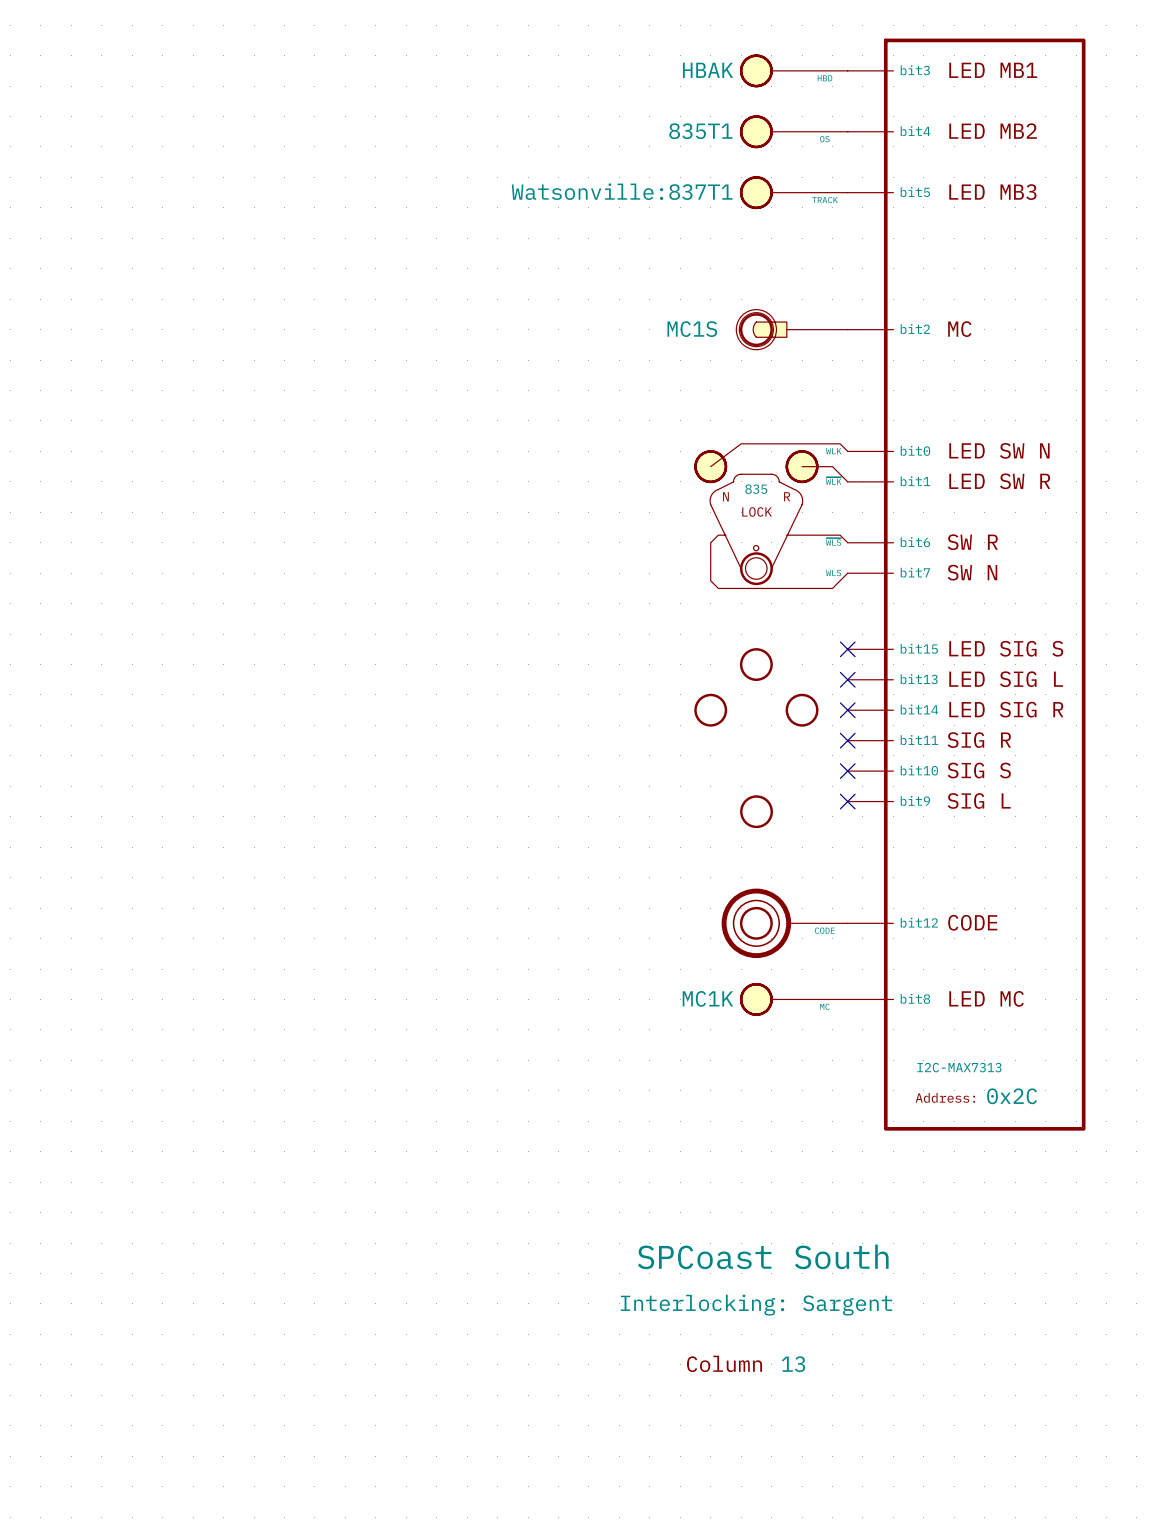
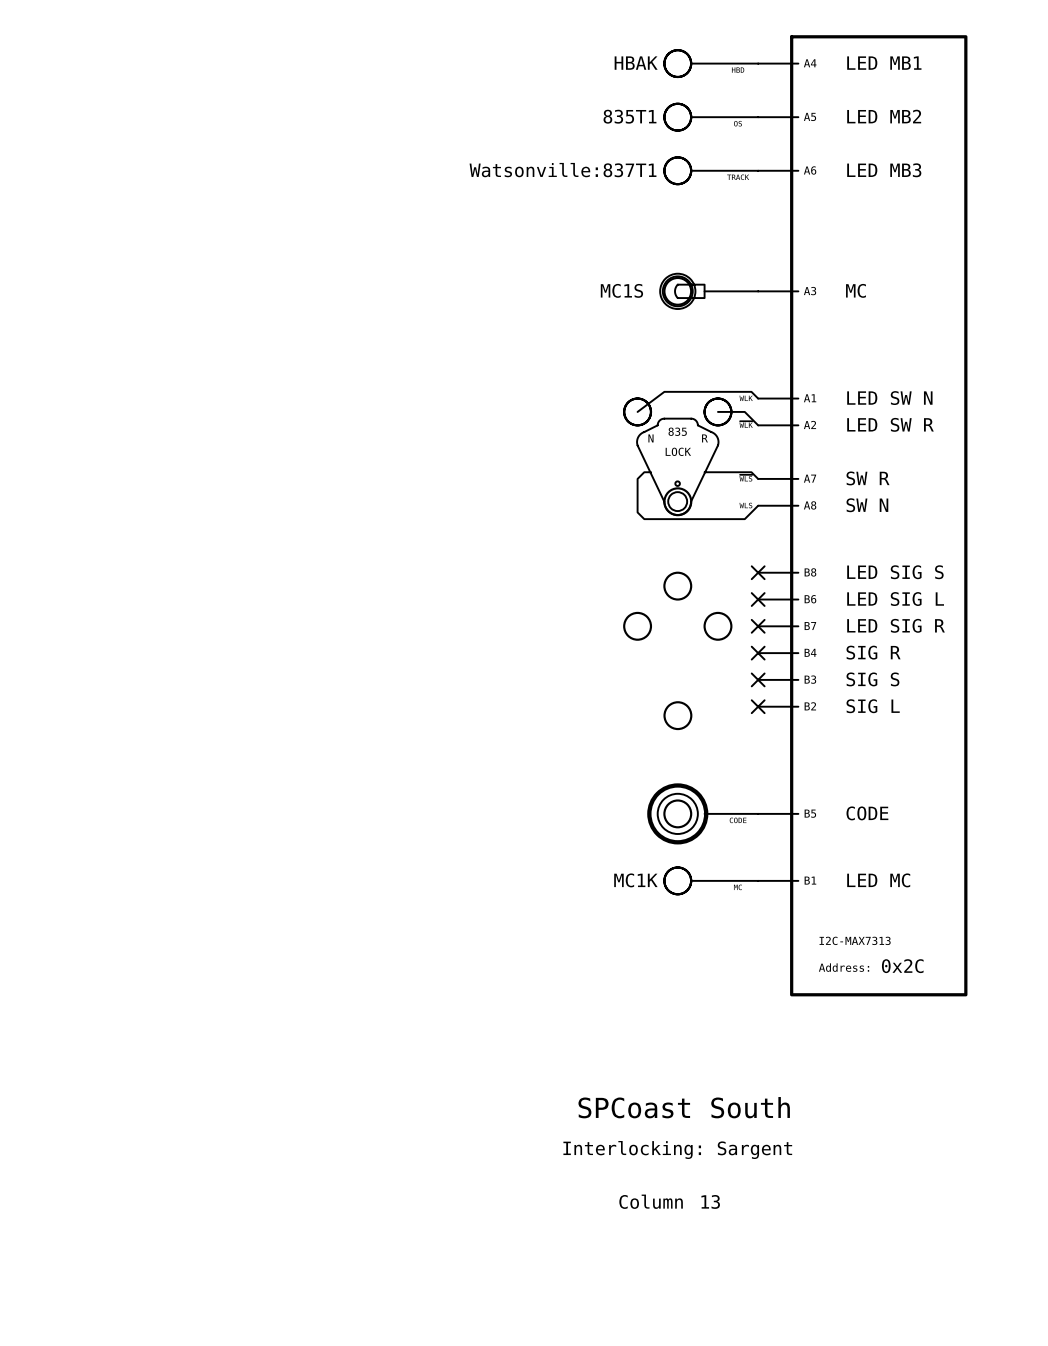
part symbol: [847, 38, 1086, 1131] -> [758, 35, 968, 997]

